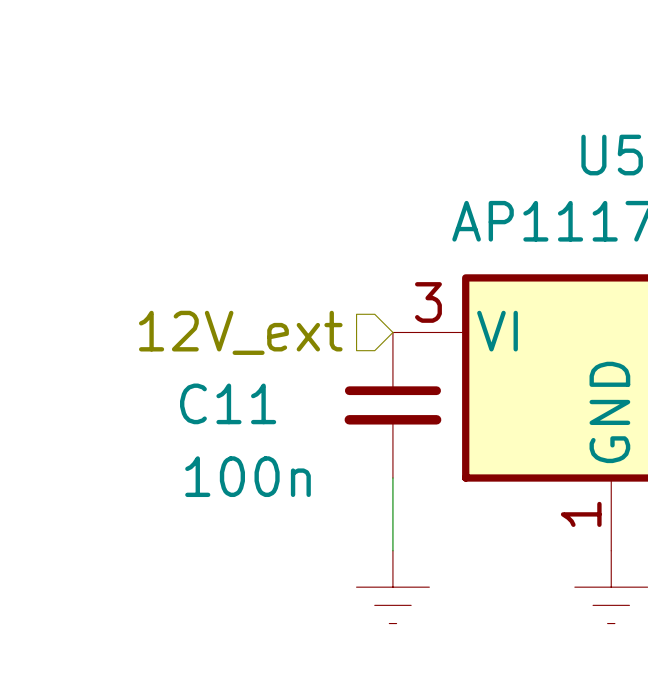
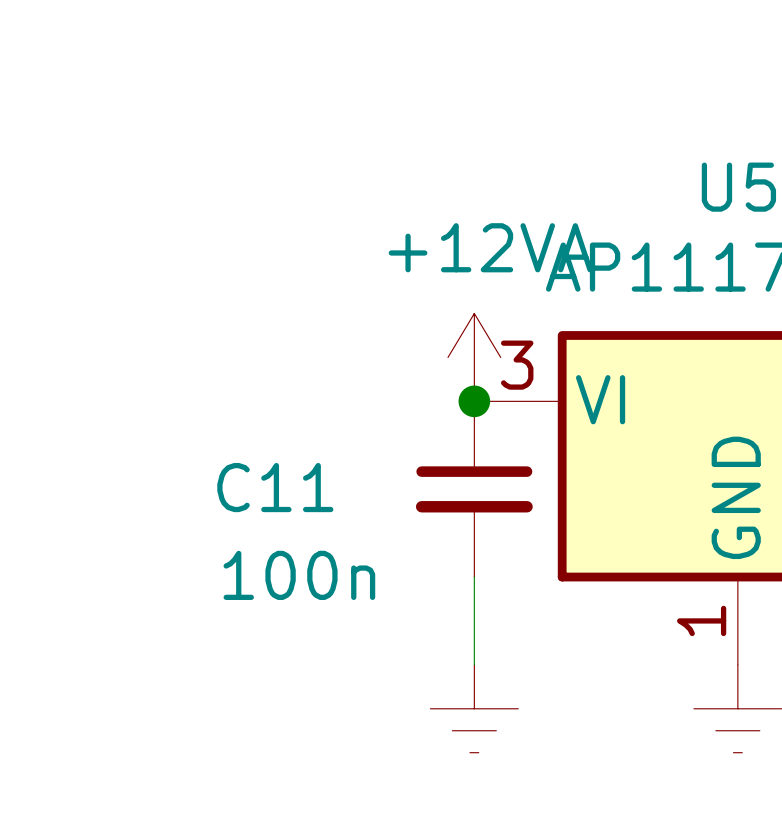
power symbol: none -> +12VA (474, 357)
hierarchical label: 12V_ext (240, 332) -> none
junction: none -> (474, 401)

